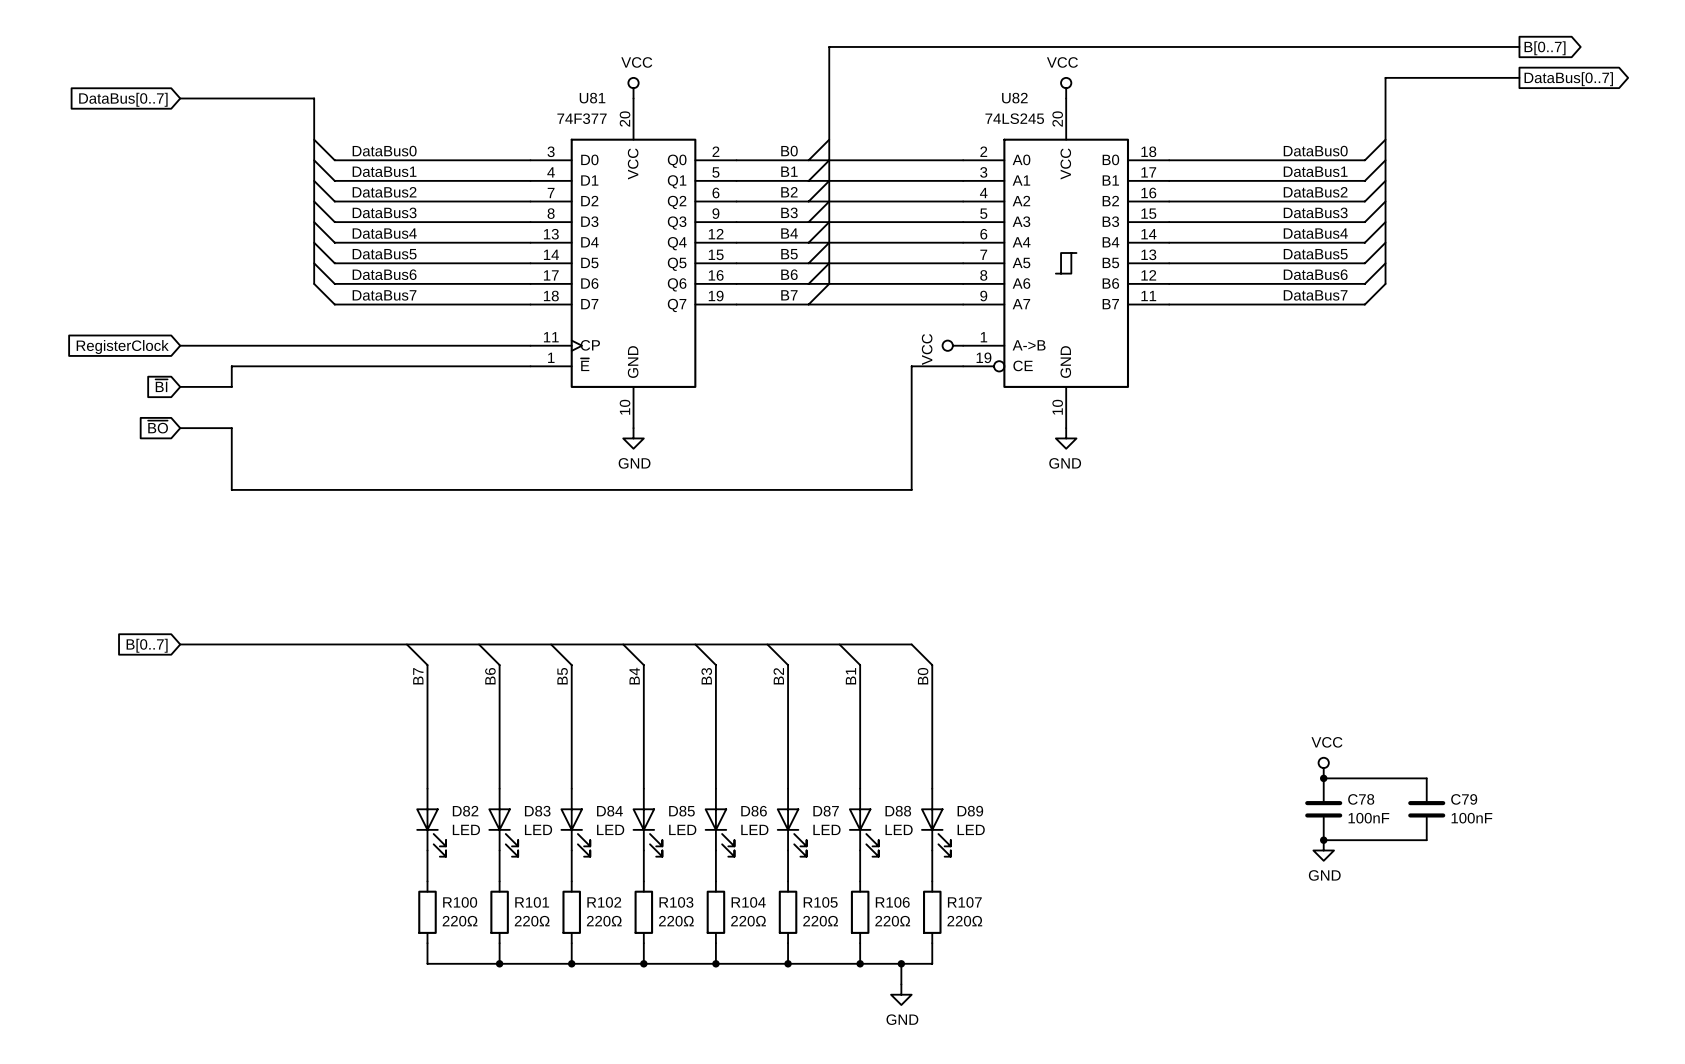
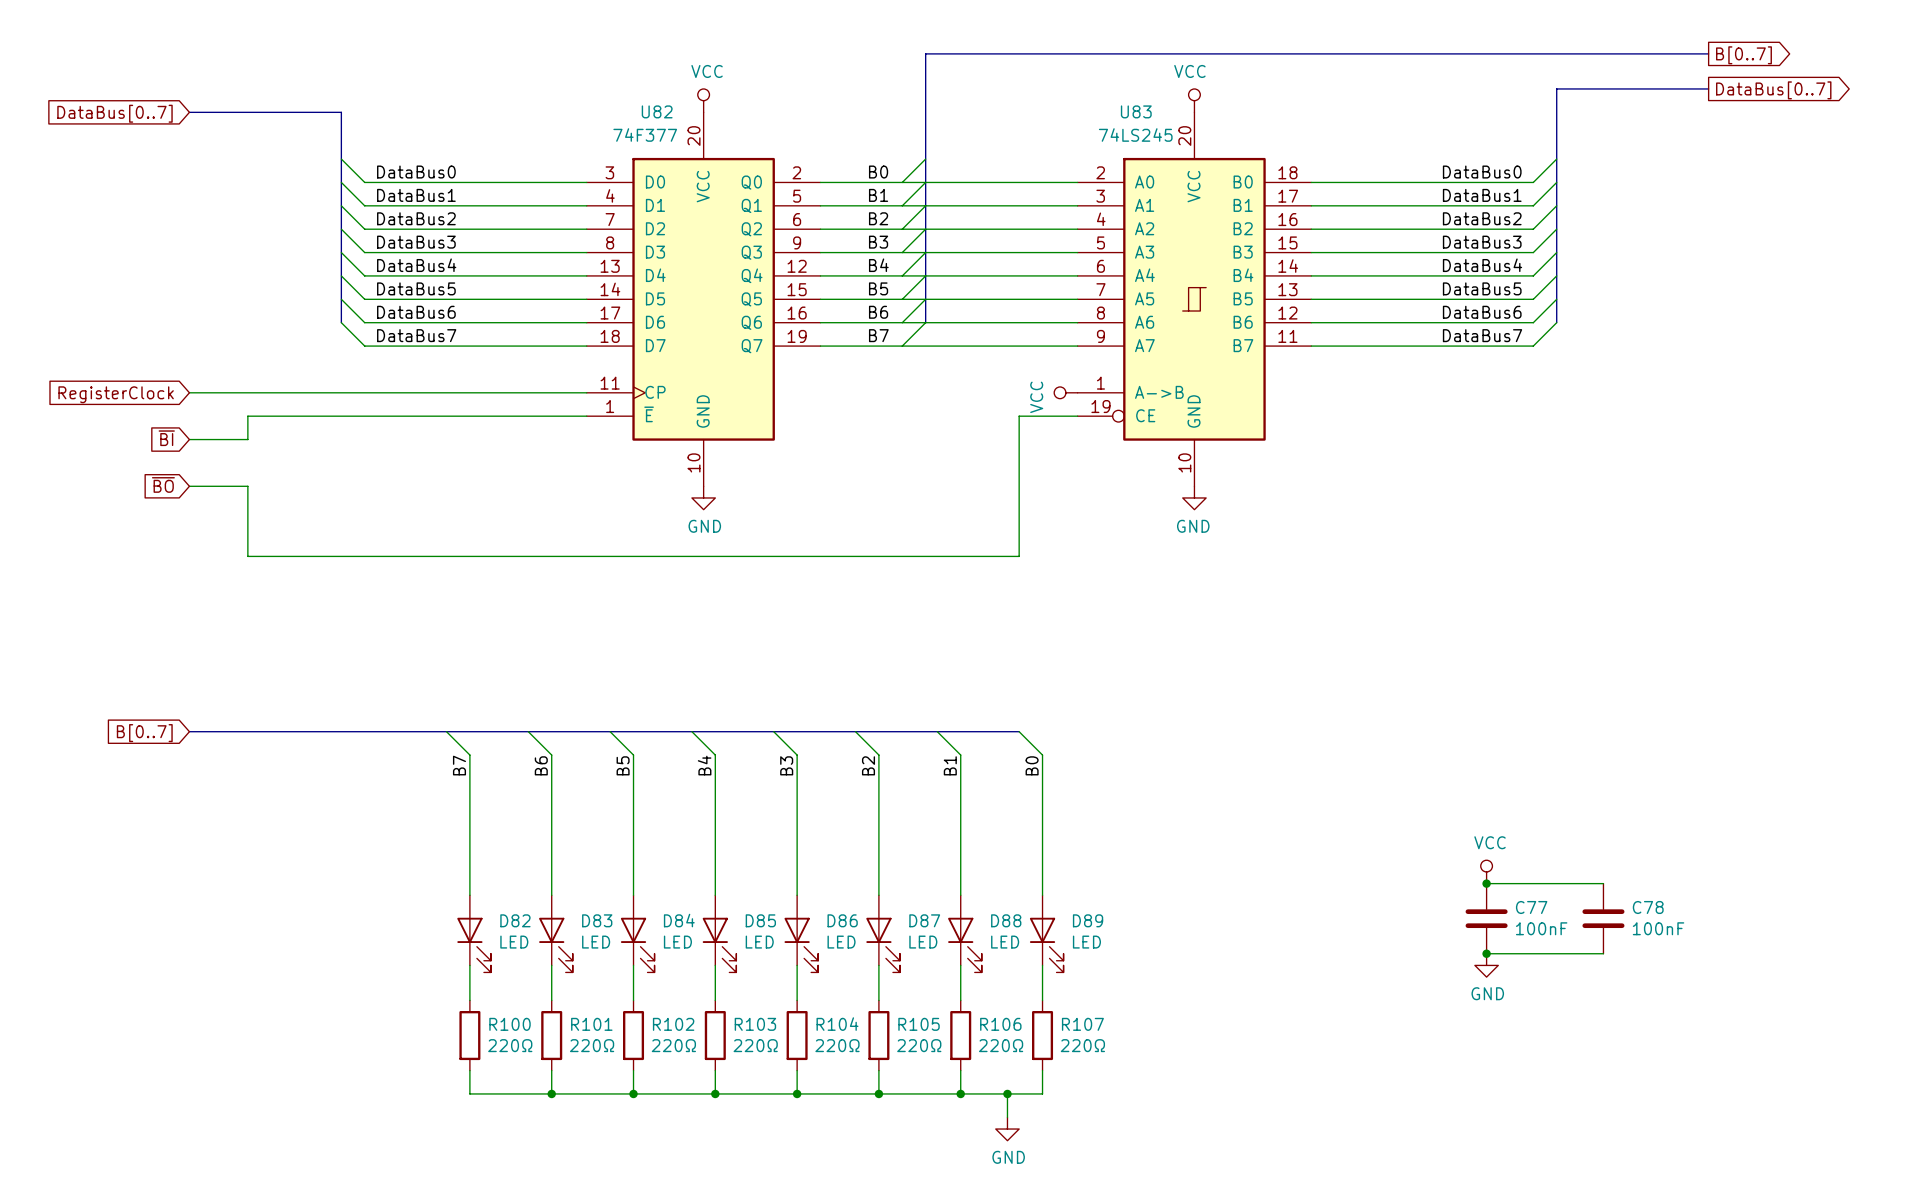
U81 name: U81 (592, 98) -> U82 (657, 111)
U82 name: U82 (1014, 98) -> U83 (1136, 111)
C78 name: C78 (1361, 799) -> C77 (1531, 907)
C79 name: C79 (1464, 799) -> C78 (1648, 907)

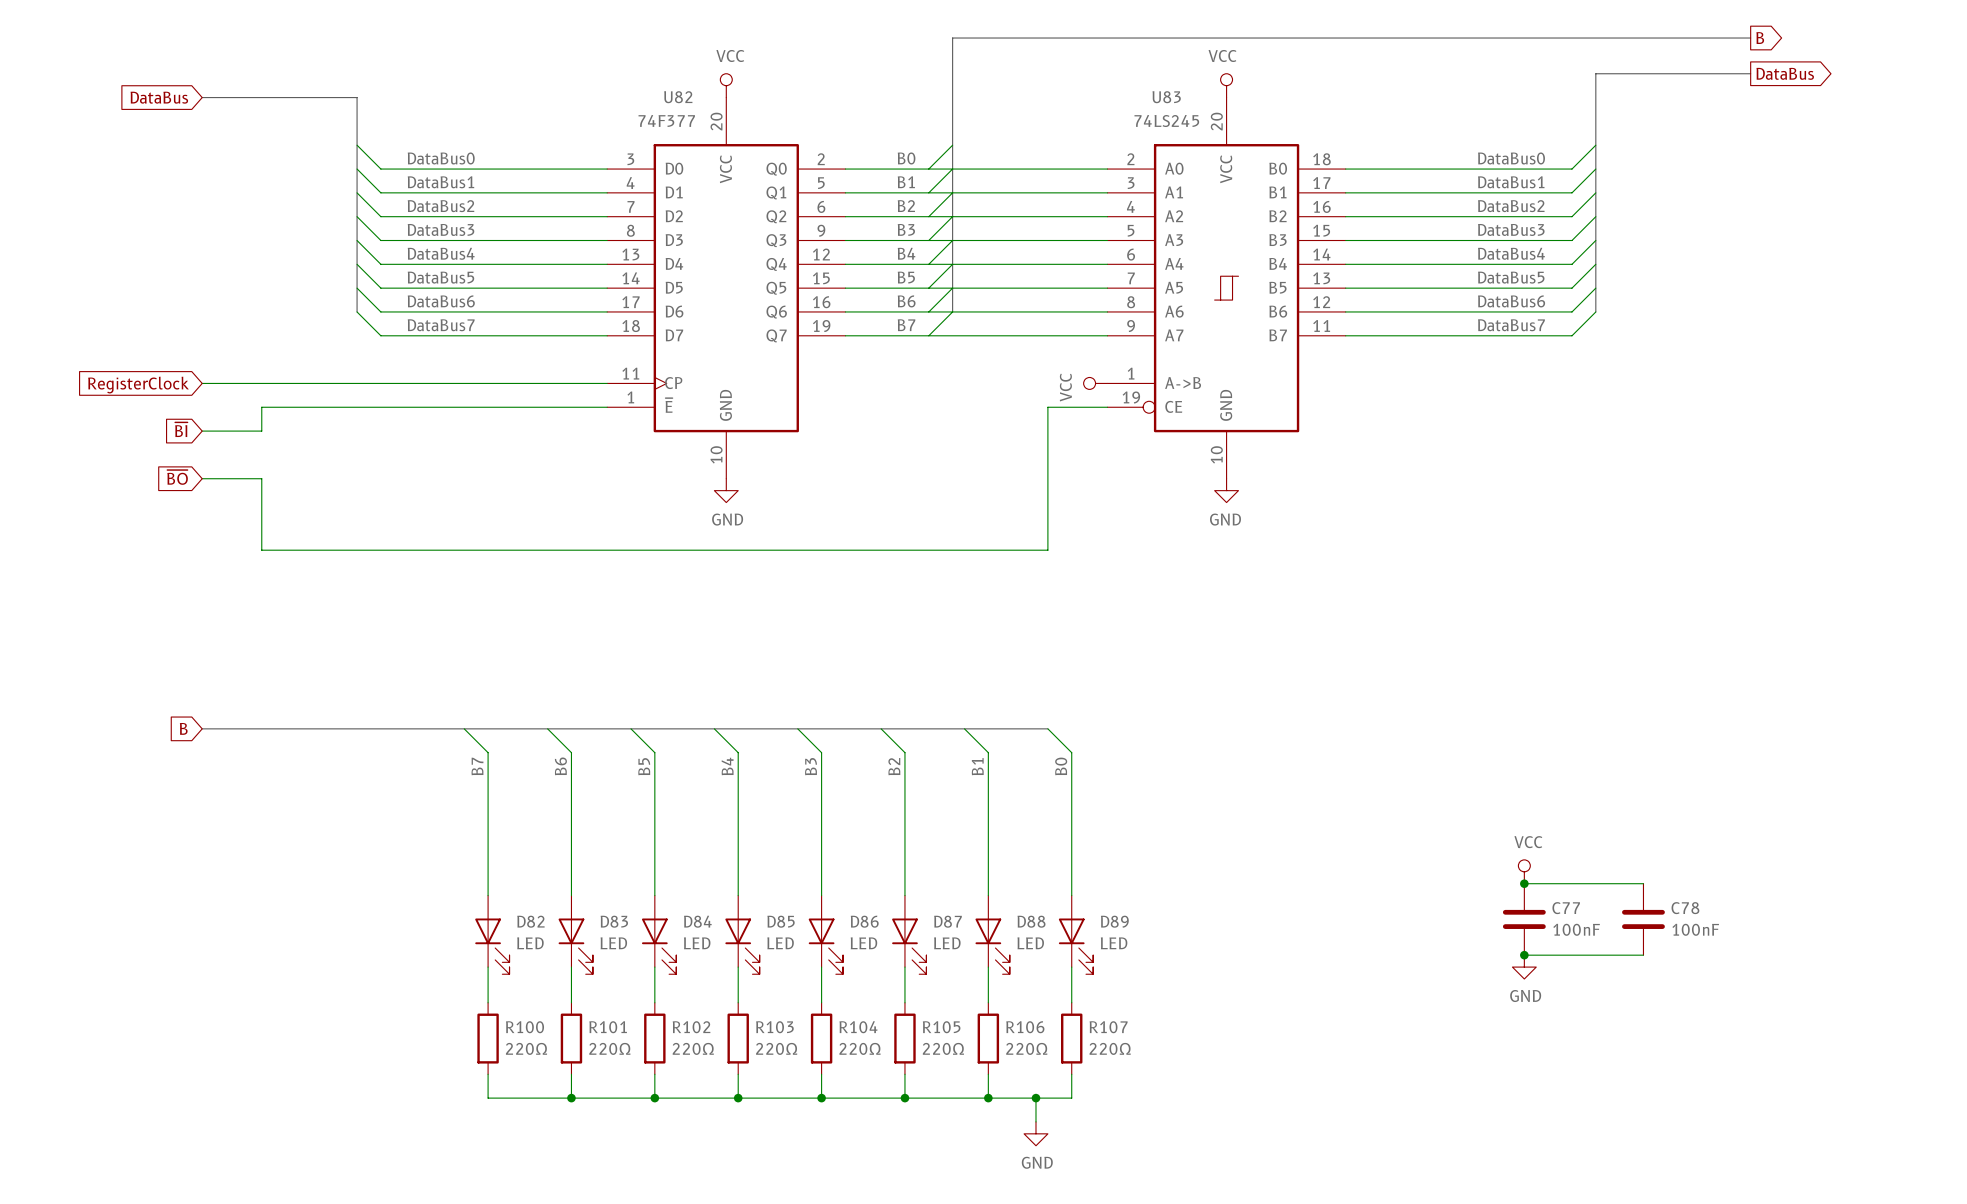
global label: B[0..7] (1743, 55) -> B (1760, 38)
global label: DataBus[0..7] (1773, 90) -> DataBus (1785, 73)
global label: DataBus[0..7] (115, 113) -> DataBus (159, 97)
global label: B[0..7] (144, 733) -> B (183, 728)

